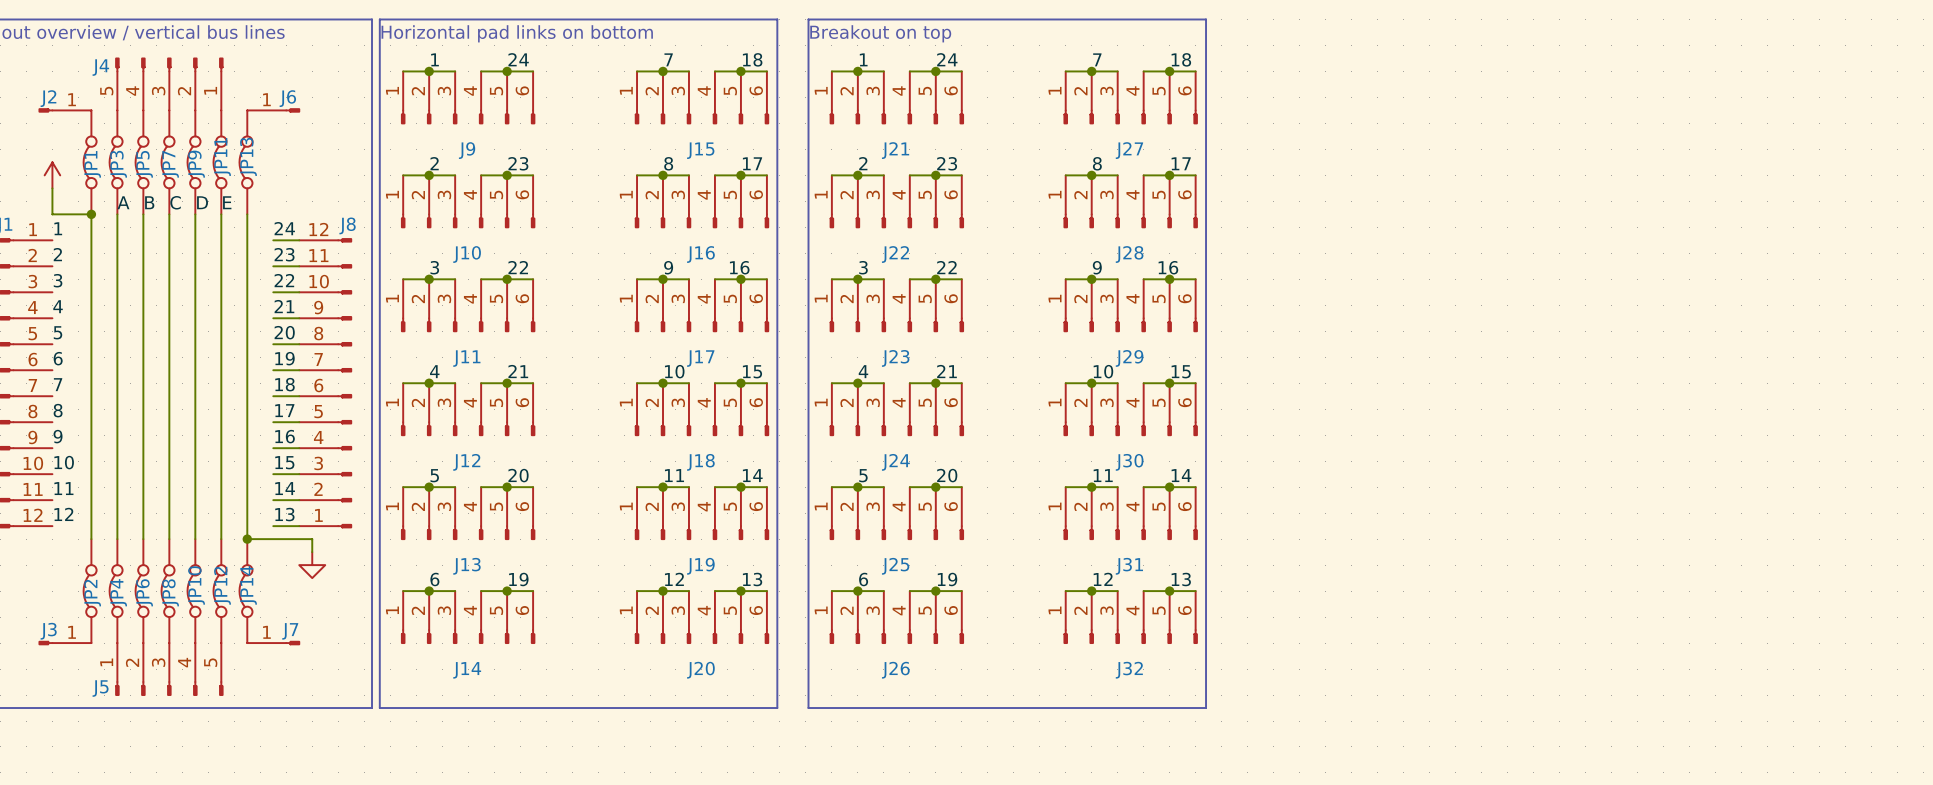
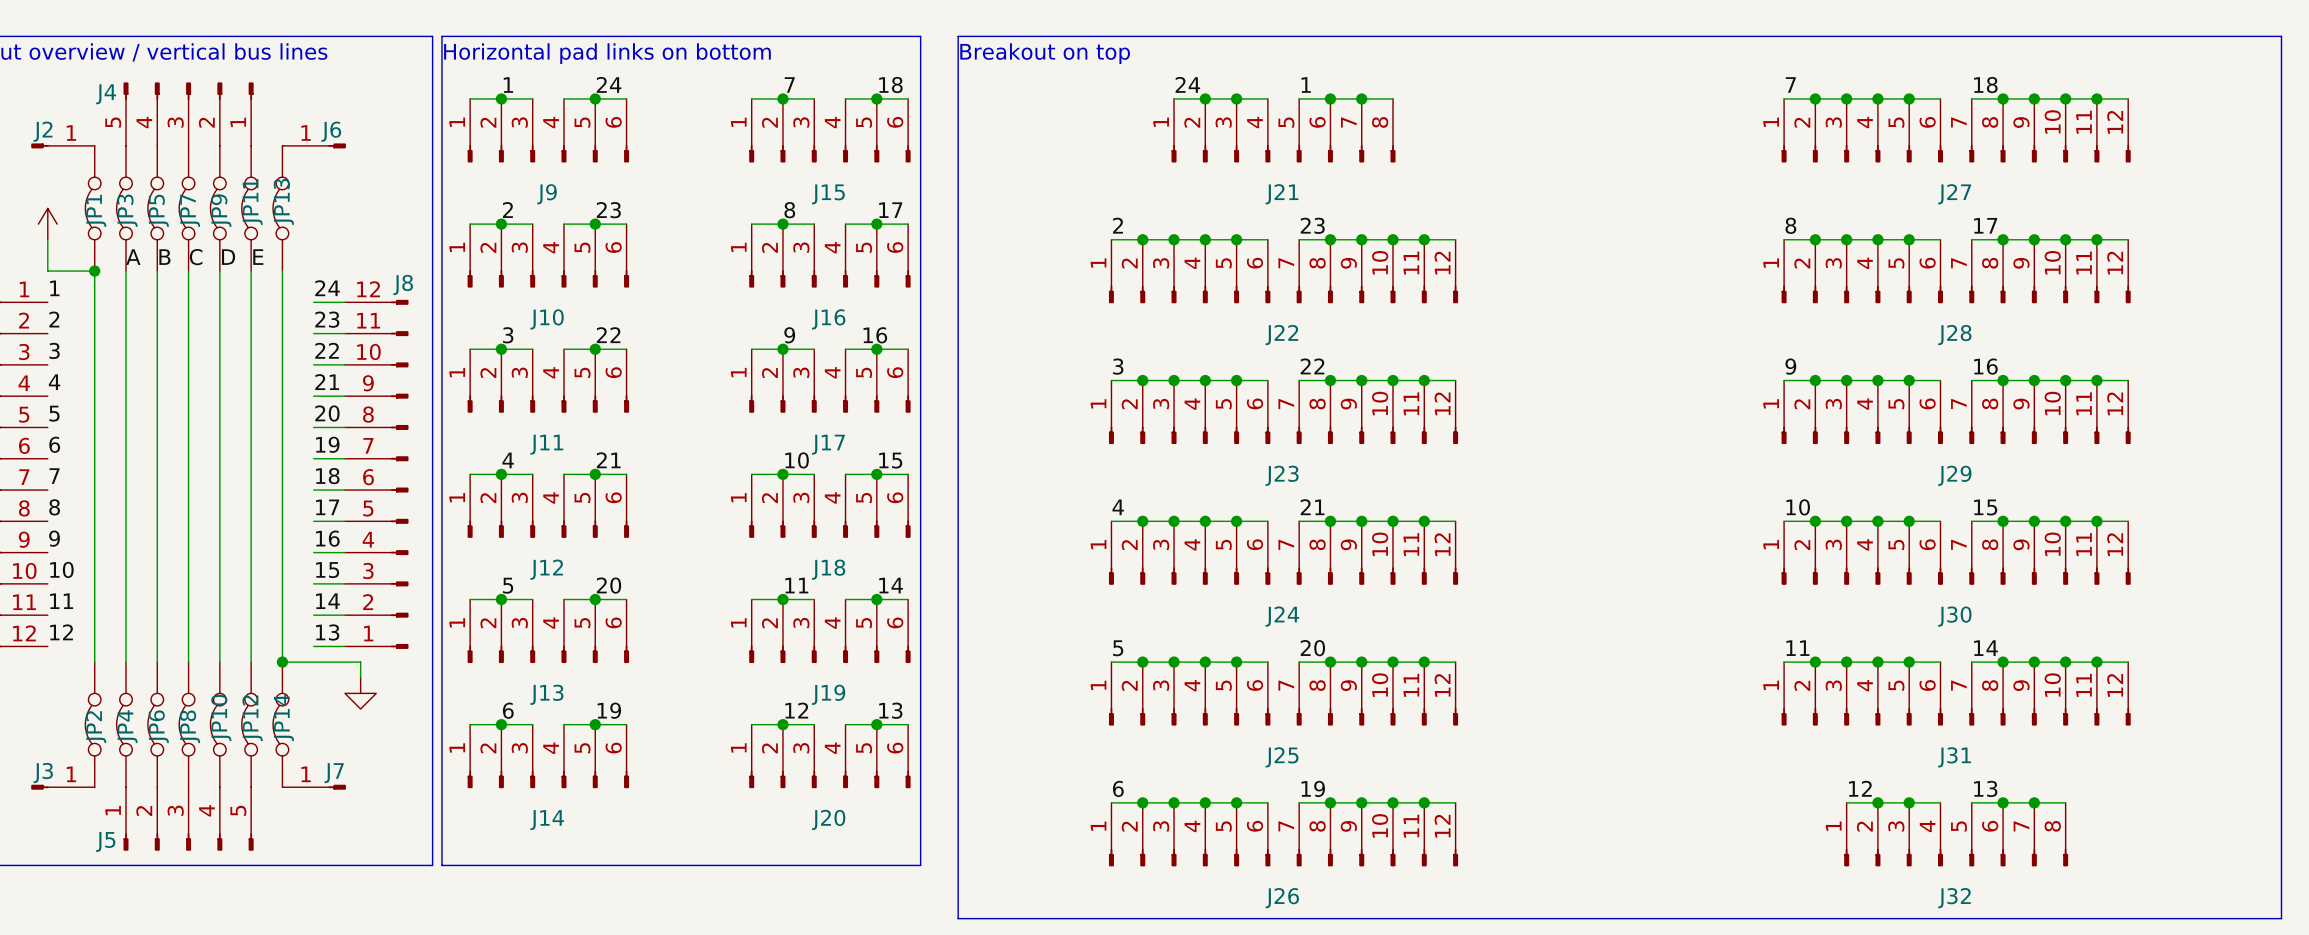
line: (1206, 19) (1206, 708) (808, 708) -> (1436, 36) (2281, 36) (2281, 918) (958, 918) (958, 865)
label: 1 (863, 59) -> none
label position: 24 (947, 59) -> 24 (1187, 84)
label: 7 (1097, 59) -> 1 (1306, 85)
label: 18 (1181, 59) -> none
label: none -> 7 (1790, 85)
label: none -> 18 (1985, 85)
J21 symbol: [829, 71, 964, 125] -> [1171, 98, 1396, 163]
wire: (831, 71) (883, 71) -> none
junction: (857, 71) -> none
wire: (909, 71) (961, 71) -> none
junction: (935, 71) -> none
junction: none -> (1205, 98)
junction: none -> (1236, 98)
J27 symbol: [1063, 71, 1198, 125] -> [1781, 98, 2131, 163]
wire: (1065, 71) (1091, 71) -> (1267, 98) (1174, 98)
junction: (1091, 71) -> none
junction: none -> (1330, 98)
junction: none -> (1361, 98)
wire: (1169, 71) (1195, 71) -> (1330, 98) (1361, 98)
junction: (1169, 71) -> none
wire: none -> (1784, 98) (1940, 98)
junction: none -> (1815, 98)
junction: none -> (1846, 98)
junction: none -> (1877, 98)
junction: none -> (1909, 98)
wire: none -> (1971, 98) (2128, 98)
junction: none -> (2003, 98)
junction: none -> (2034, 98)
junction: none -> (2065, 98)
junction: none -> (2096, 98)
label position: 2 (863, 163) -> 2 (1117, 225)
label position: 23 (947, 163) -> 23 (1312, 225)
label: 8 (1097, 163) -> none
label: 17 (1181, 163) -> none
J22 symbol: [829, 175, 964, 229] -> [1108, 239, 1459, 304]
wire: (831, 175) (883, 175) -> none
junction: (857, 175) -> none
wire: (909, 175) (961, 175) -> none
junction: (935, 175) -> none
J28 symbol: [1063, 175, 1198, 229] -> [1781, 239, 2131, 304]
wire: (1065, 175) (1117, 175) -> none
junction: (1091, 175) -> none
wire: (1143, 175) (1195, 175) -> none
junction position: (1169, 175) -> (1393, 239)
label: none -> 8 (1790, 225)
label: none -> 17 (1985, 225)
wire: none -> (1111, 239) (1267, 239)
junction: none -> (1142, 239)
junction: none -> (1174, 239)
junction: none -> (1205, 239)
junction: none -> (1236, 239)
wire: none -> (1299, 239) (1455, 239)
junction: none -> (1330, 239)
junction: none -> (1361, 239)
junction: none -> (1424, 239)
wire: none -> (1784, 239) (1940, 239)
junction: none -> (1815, 239)
junction: none -> (1846, 239)
junction: none -> (1877, 239)
junction: none -> (1909, 239)
wire: none -> (1971, 239) (2128, 239)
junction: none -> (2003, 239)
junction: none -> (2034, 239)
junction: none -> (2065, 239)
junction: none -> (2096, 239)
label position: 3 (863, 267) -> 3 (1118, 366)
label position: 22 (946, 267) -> 22 (1312, 366)
label: 9 (1097, 267) -> none
label: 16 (1168, 267) -> none
J23 symbol: [829, 279, 964, 333] -> [1108, 380, 1459, 445]
wire: (831, 279) (883, 279) -> none
junction: (857, 279) -> none
wire: (909, 279) (961, 279) -> none
junction: (935, 279) -> none
J29 symbol: [1063, 279, 1198, 333] -> [1781, 380, 2131, 445]
wire: (1065, 279) (1117, 279) -> none
junction: (1091, 279) -> none
wire: (1143, 279) (1195, 279) -> none
junction: (1169, 279) -> none
label: none -> 9 (1790, 366)
label: none -> 16 (1985, 366)
wire: none -> (1111, 380) (1267, 380)
junction: none -> (1142, 380)
junction: none -> (1174, 380)
junction: none -> (1205, 380)
junction: none -> (1236, 380)
wire: none -> (1299, 380) (1455, 380)
junction: none -> (1330, 380)
junction: none -> (1361, 380)
junction: none -> (1393, 380)
junction: none -> (1424, 380)
wire: none -> (1784, 380) (1940, 380)
junction: none -> (1815, 380)
junction: none -> (1846, 380)
junction: none -> (1877, 380)
junction: none -> (1909, 380)
wire: none -> (1971, 380) (2128, 380)
junction: none -> (2003, 380)
junction: none -> (2034, 380)
junction: none -> (2065, 380)
junction: none -> (2096, 380)
label position: 4 (863, 371) -> 4 (1118, 507)
label position: 21 (946, 371) -> 21 (1312, 507)
label: 10 (1103, 371) -> none
label: 15 (1181, 371) -> none
J24 symbol: [829, 383, 964, 436] -> [1108, 521, 1459, 585]
wire: (831, 383) (883, 383) -> none
junction: (857, 383) -> none
wire: (909, 383) (961, 383) -> none
junction: (935, 383) -> none
J30 symbol: [1063, 383, 1198, 436] -> [1781, 521, 2131, 585]
wire: (1065, 383) (1117, 383) -> none
junction: (1091, 383) -> none
wire: (1143, 383) (1195, 383) -> none
junction: (1169, 383) -> none
label: none -> 10 (1798, 507)
label: none -> 15 (1985, 507)
wire: none -> (1111, 521) (1267, 521)
junction: none -> (1142, 521)
junction: none -> (1174, 521)
junction: none -> (1205, 521)
junction: none -> (1236, 521)
wire: none -> (1299, 521) (1455, 521)
junction: none -> (1330, 521)
junction: none -> (1361, 521)
junction: none -> (1393, 521)
junction: none -> (1424, 521)
wire: none -> (1784, 521) (1940, 521)
junction: none -> (1815, 521)
junction: none -> (1846, 521)
junction: none -> (1877, 521)
junction: none -> (1909, 521)
wire: none -> (1971, 521) (2128, 521)
junction: none -> (2003, 521)
junction: none -> (2034, 521)
junction: none -> (2065, 521)
junction: none -> (2096, 521)
label position: 5 (863, 475) -> 5 (1118, 648)
label position: 20 (947, 475) -> 20 (1312, 648)
label: 11 (1103, 475) -> none
label: 14 (1181, 475) -> none
J25 symbol: [829, 487, 964, 540] -> [1108, 662, 1459, 726]
wire: (831, 487) (883, 487) -> none
junction: (857, 487) -> none
wire: (909, 487) (961, 487) -> none
junction: (935, 487) -> none
J31 symbol: [1063, 487, 1198, 540] -> [1781, 662, 2131, 726]
wire: (1065, 487) (1117, 487) -> none
junction: (1091, 487) -> none
wire: (1143, 487) (1195, 487) -> none
junction: (1169, 487) -> none
label: none -> 11 (1797, 648)
label: none -> 14 (1986, 648)
wire: none -> (1111, 662) (1267, 662)
junction: none -> (1142, 662)
junction: none -> (1174, 662)
junction: none -> (1205, 662)
junction: none -> (1236, 662)
wire: none -> (1299, 662) (1455, 662)
junction: none -> (1330, 662)
junction: none -> (1361, 662)
junction: none -> (1393, 662)
junction: none -> (1424, 662)
wire: none -> (1784, 662) (1940, 662)
junction: none -> (1815, 662)
junction: none -> (1846, 662)
junction: none -> (1877, 662)
junction: none -> (1909, 662)
wire: none -> (1971, 662) (2128, 662)
junction: none -> (2003, 662)
junction: none -> (2034, 662)
junction: none -> (2065, 662)
junction: none -> (2096, 662)
label position: 6 (863, 579) -> 6 (1118, 788)
label position: 19 (947, 579) -> 19 (1313, 788)
label: 12 (1103, 579) -> none
label: 13 (1181, 579) -> none
J26 symbol: [829, 591, 964, 644] -> [1108, 802, 1459, 867]
wire: (831, 591) (883, 591) -> none
junction: (857, 591) -> none
wire: (909, 591) (961, 591) -> none
junction: (935, 591) -> none
J32 symbol: [1063, 591, 1198, 644] -> [1844, 802, 2069, 867]
wire: (1065, 591) (1117, 591) -> none
junction: (1091, 591) -> none
wire: (1143, 591) (1195, 591) -> none
junction: (1169, 591) -> none
label: none -> 12 (1860, 788)
label: none -> 13 (1985, 788)
wire: none -> (1111, 802) (1267, 802)
junction: none -> (1142, 802)
junction: none -> (1174, 802)
junction: none -> (1205, 802)
junction: none -> (1236, 802)
wire: none -> (1299, 802) (1455, 802)
junction: none -> (1330, 802)
junction: none -> (1361, 802)
junction: none -> (1393, 802)
junction: none -> (1424, 802)
wire: none -> (1846, 802) (1940, 802)
junction: none -> (1877, 802)
junction: none -> (1909, 802)
wire: none -> (1971, 802) (2065, 802)
junction: none -> (2003, 802)
junction: none -> (2034, 802)

